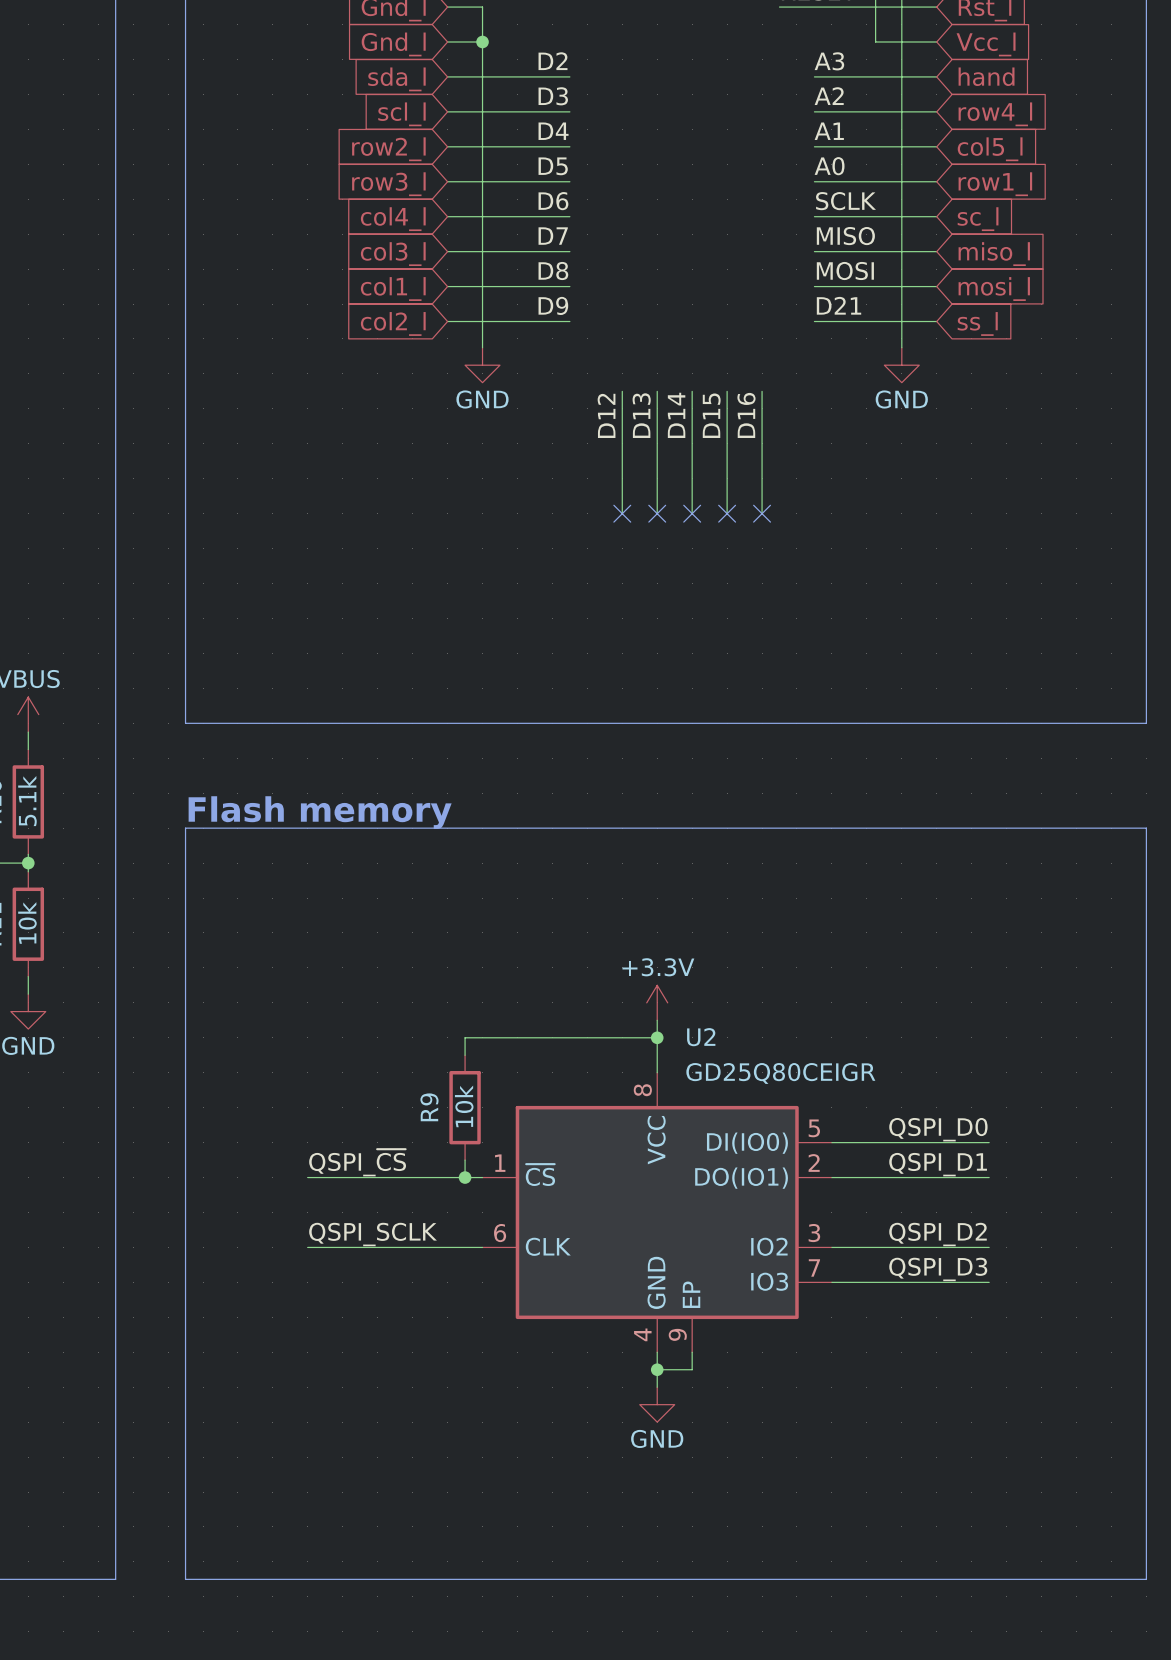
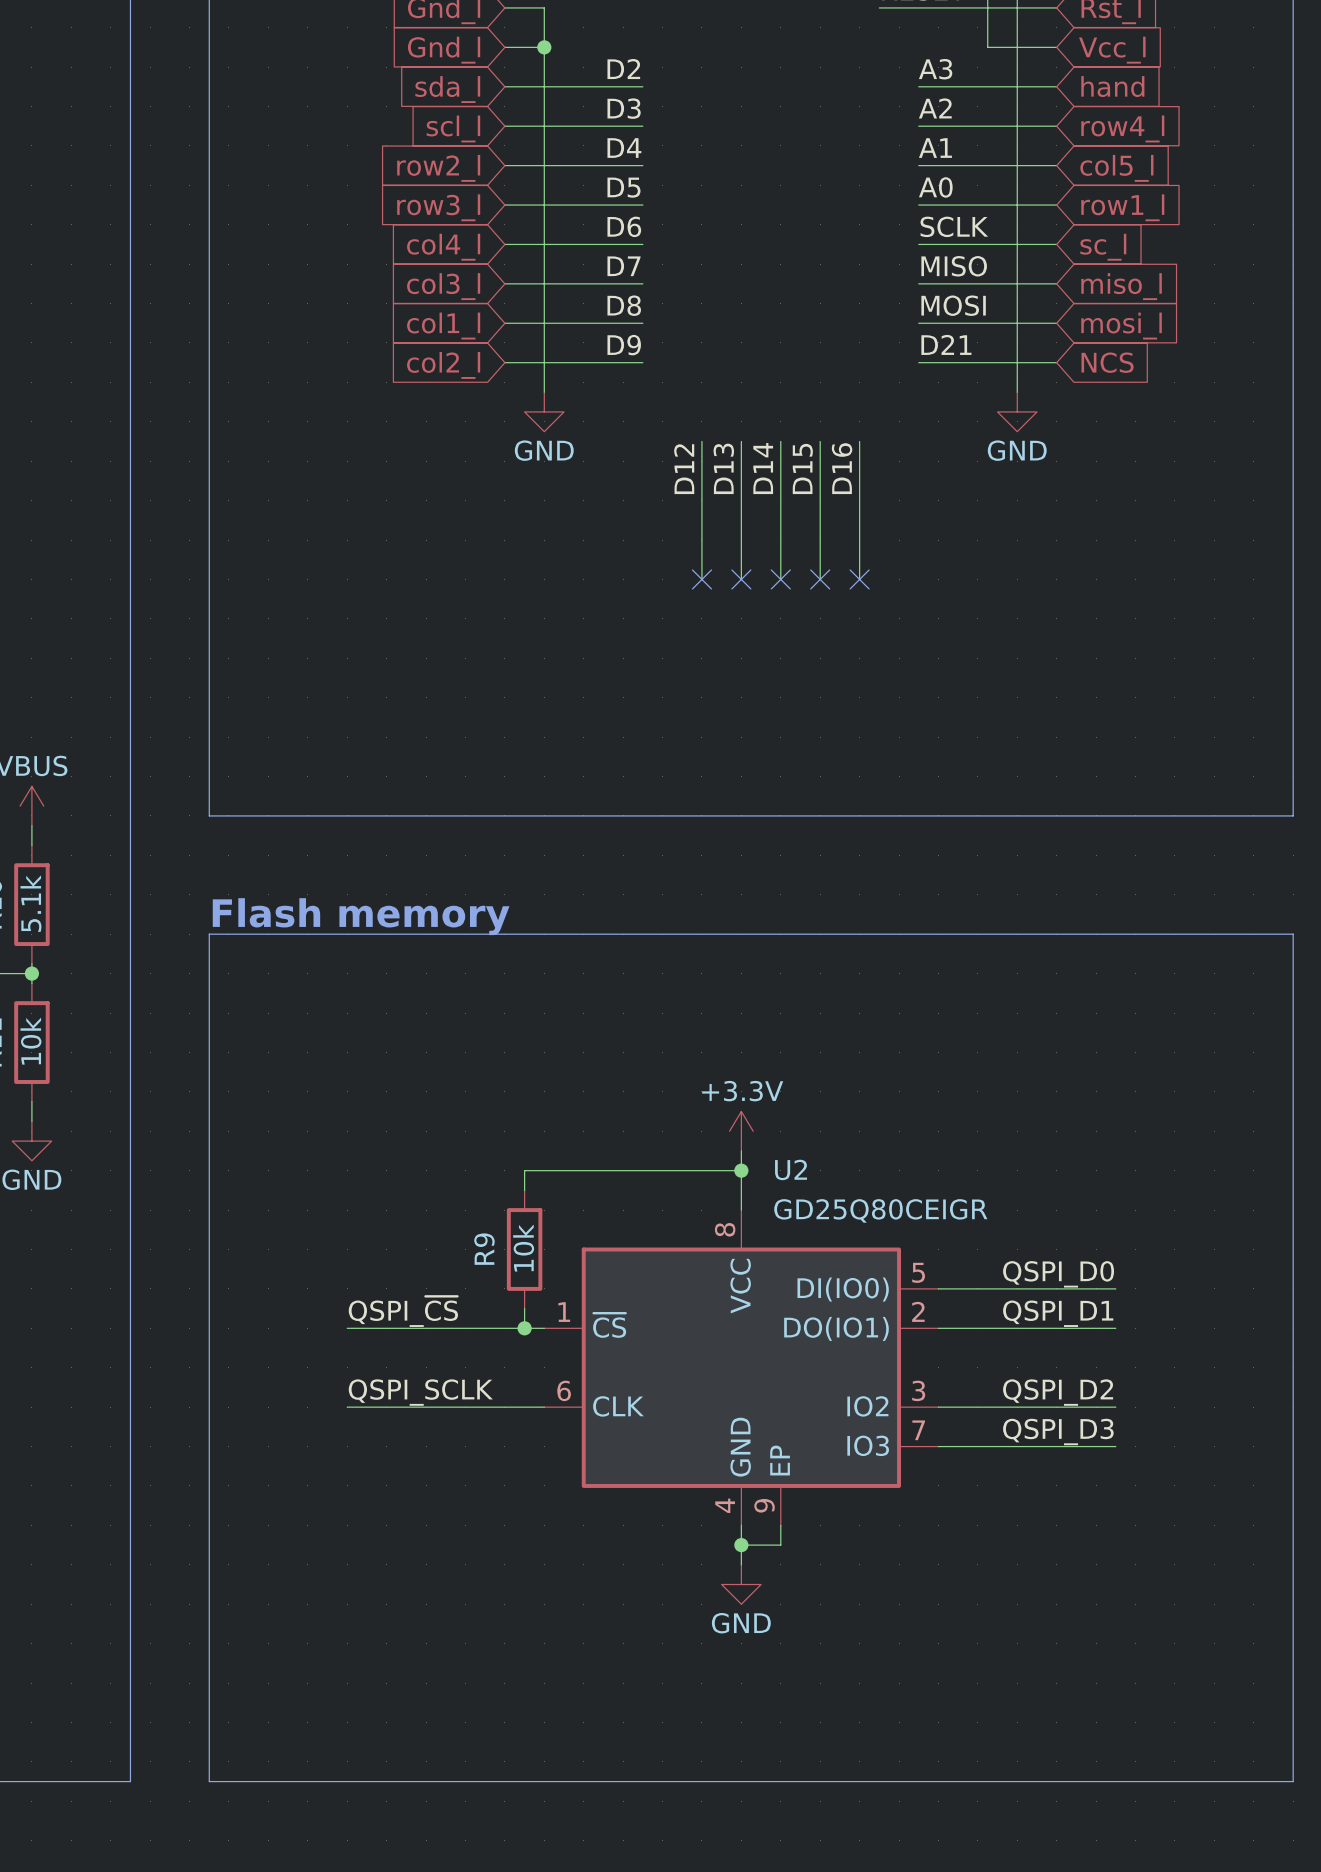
global label: ss_l (977, 323) -> NCS (1107, 362)

